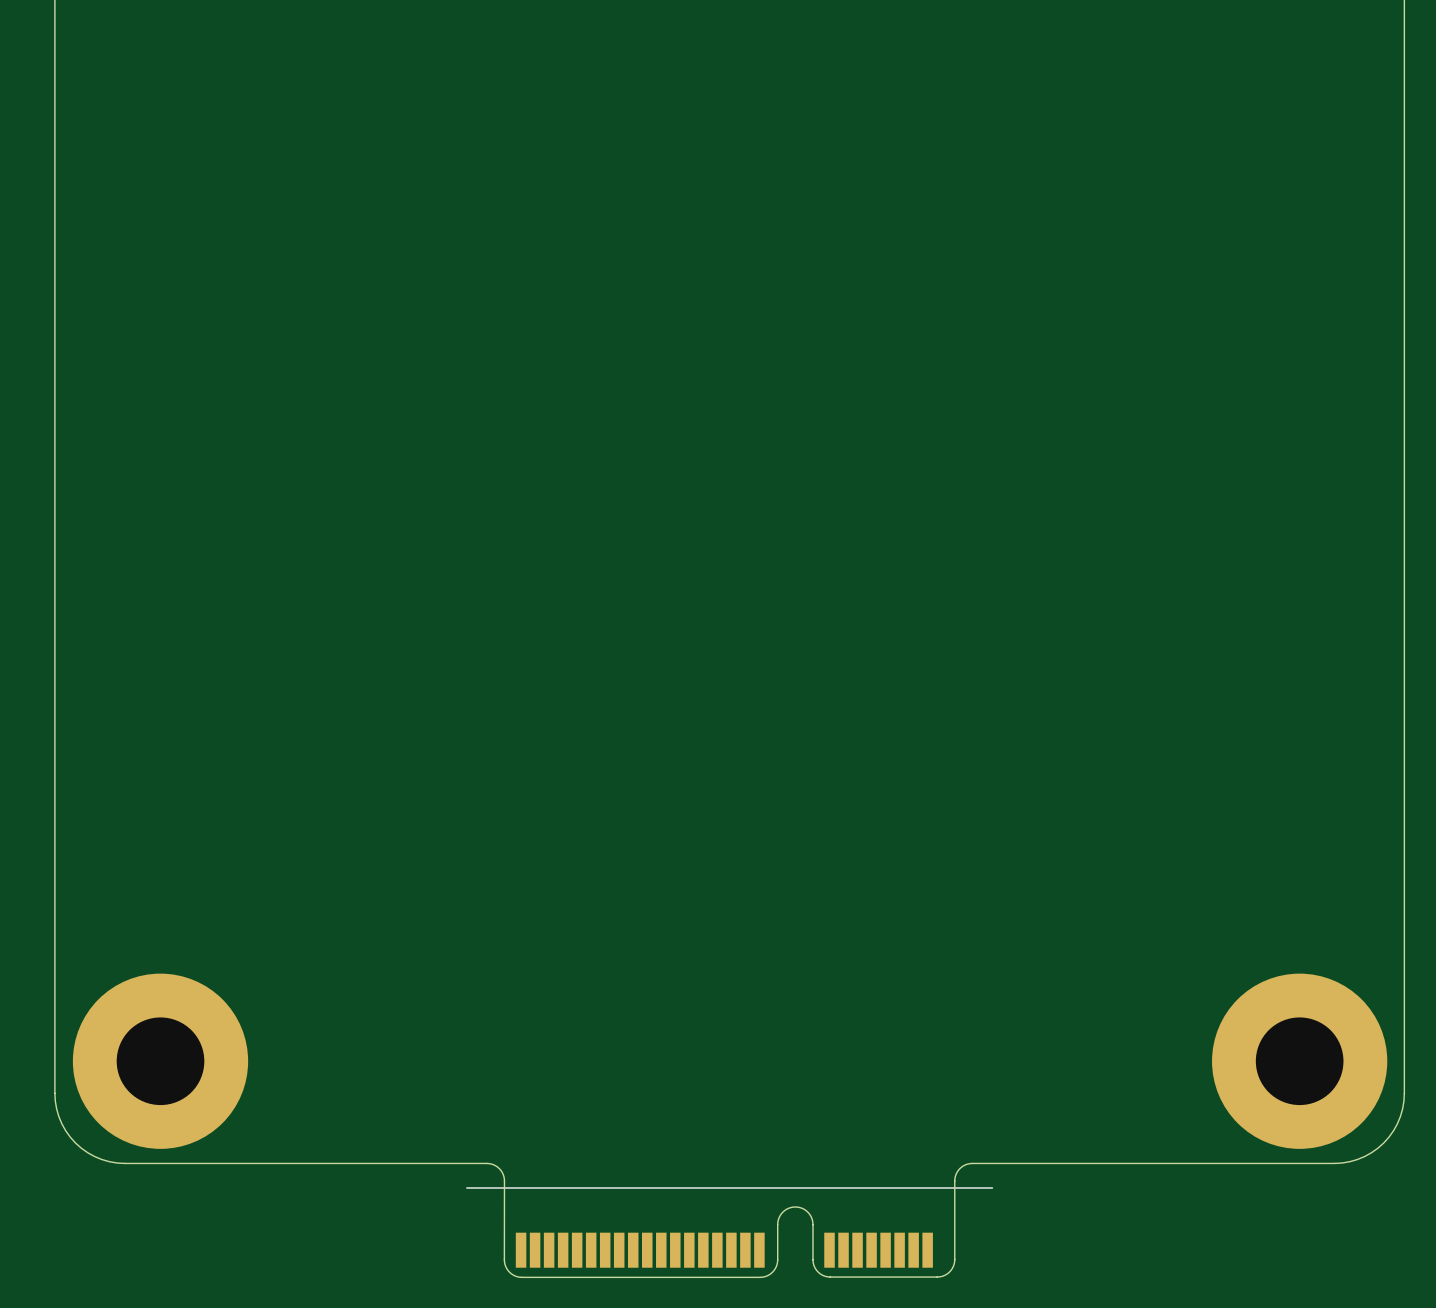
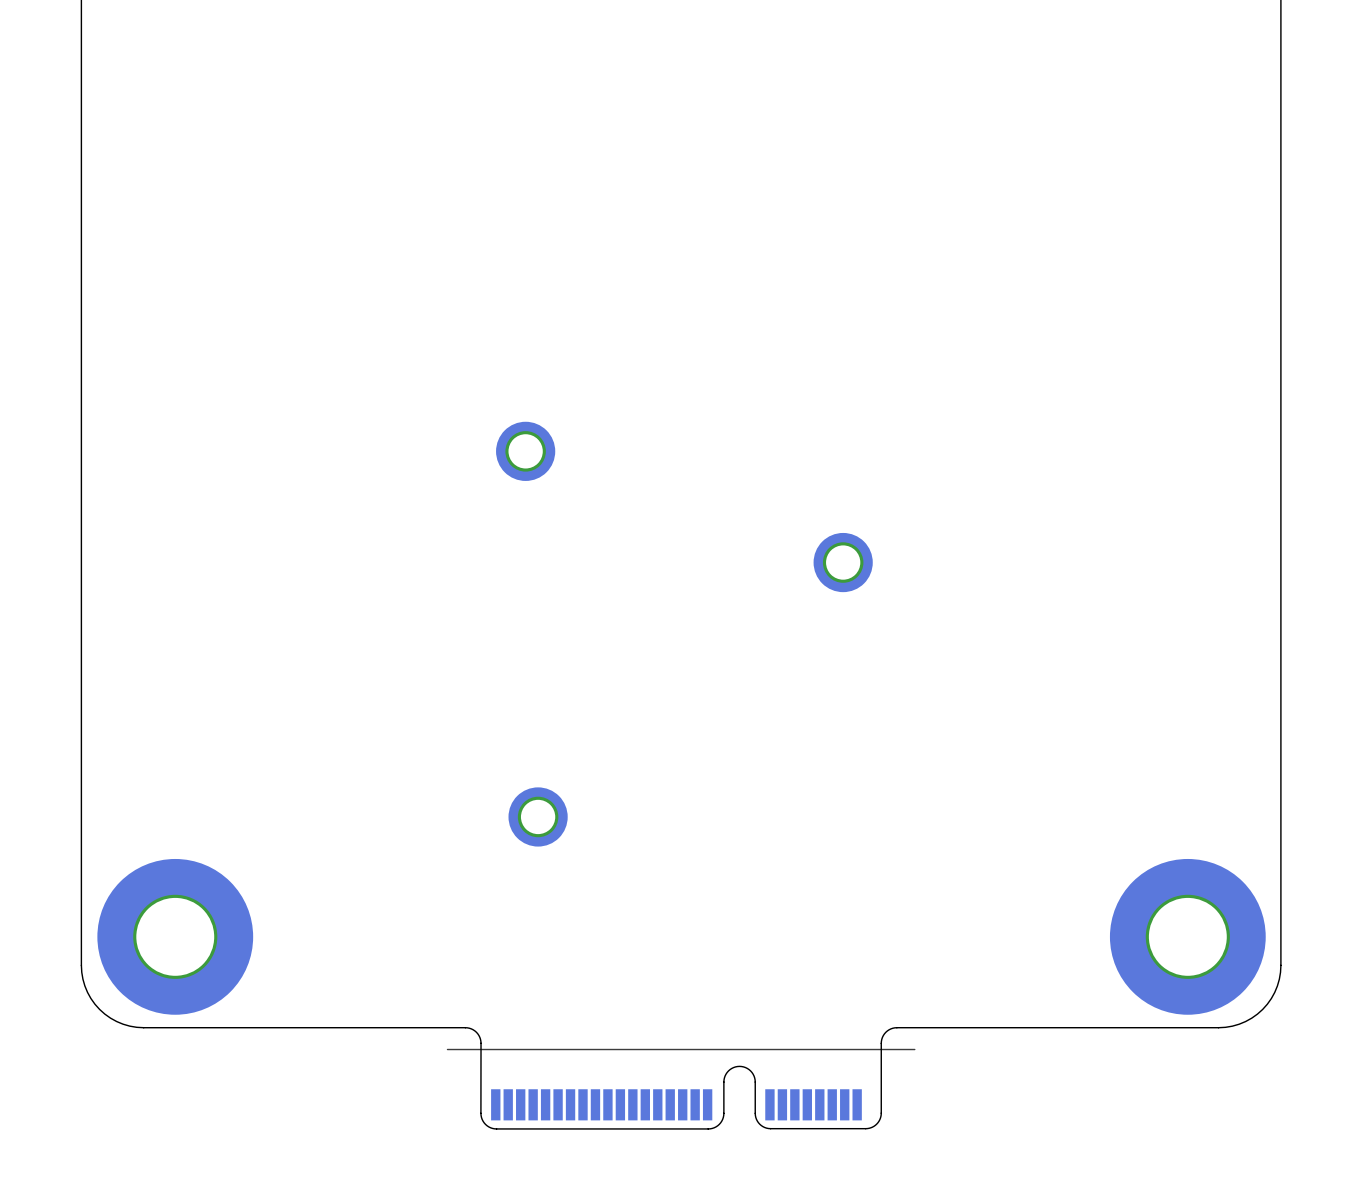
part: none -> (525, 451)
part: none -> (843, 562)
part: none -> (538, 816)

